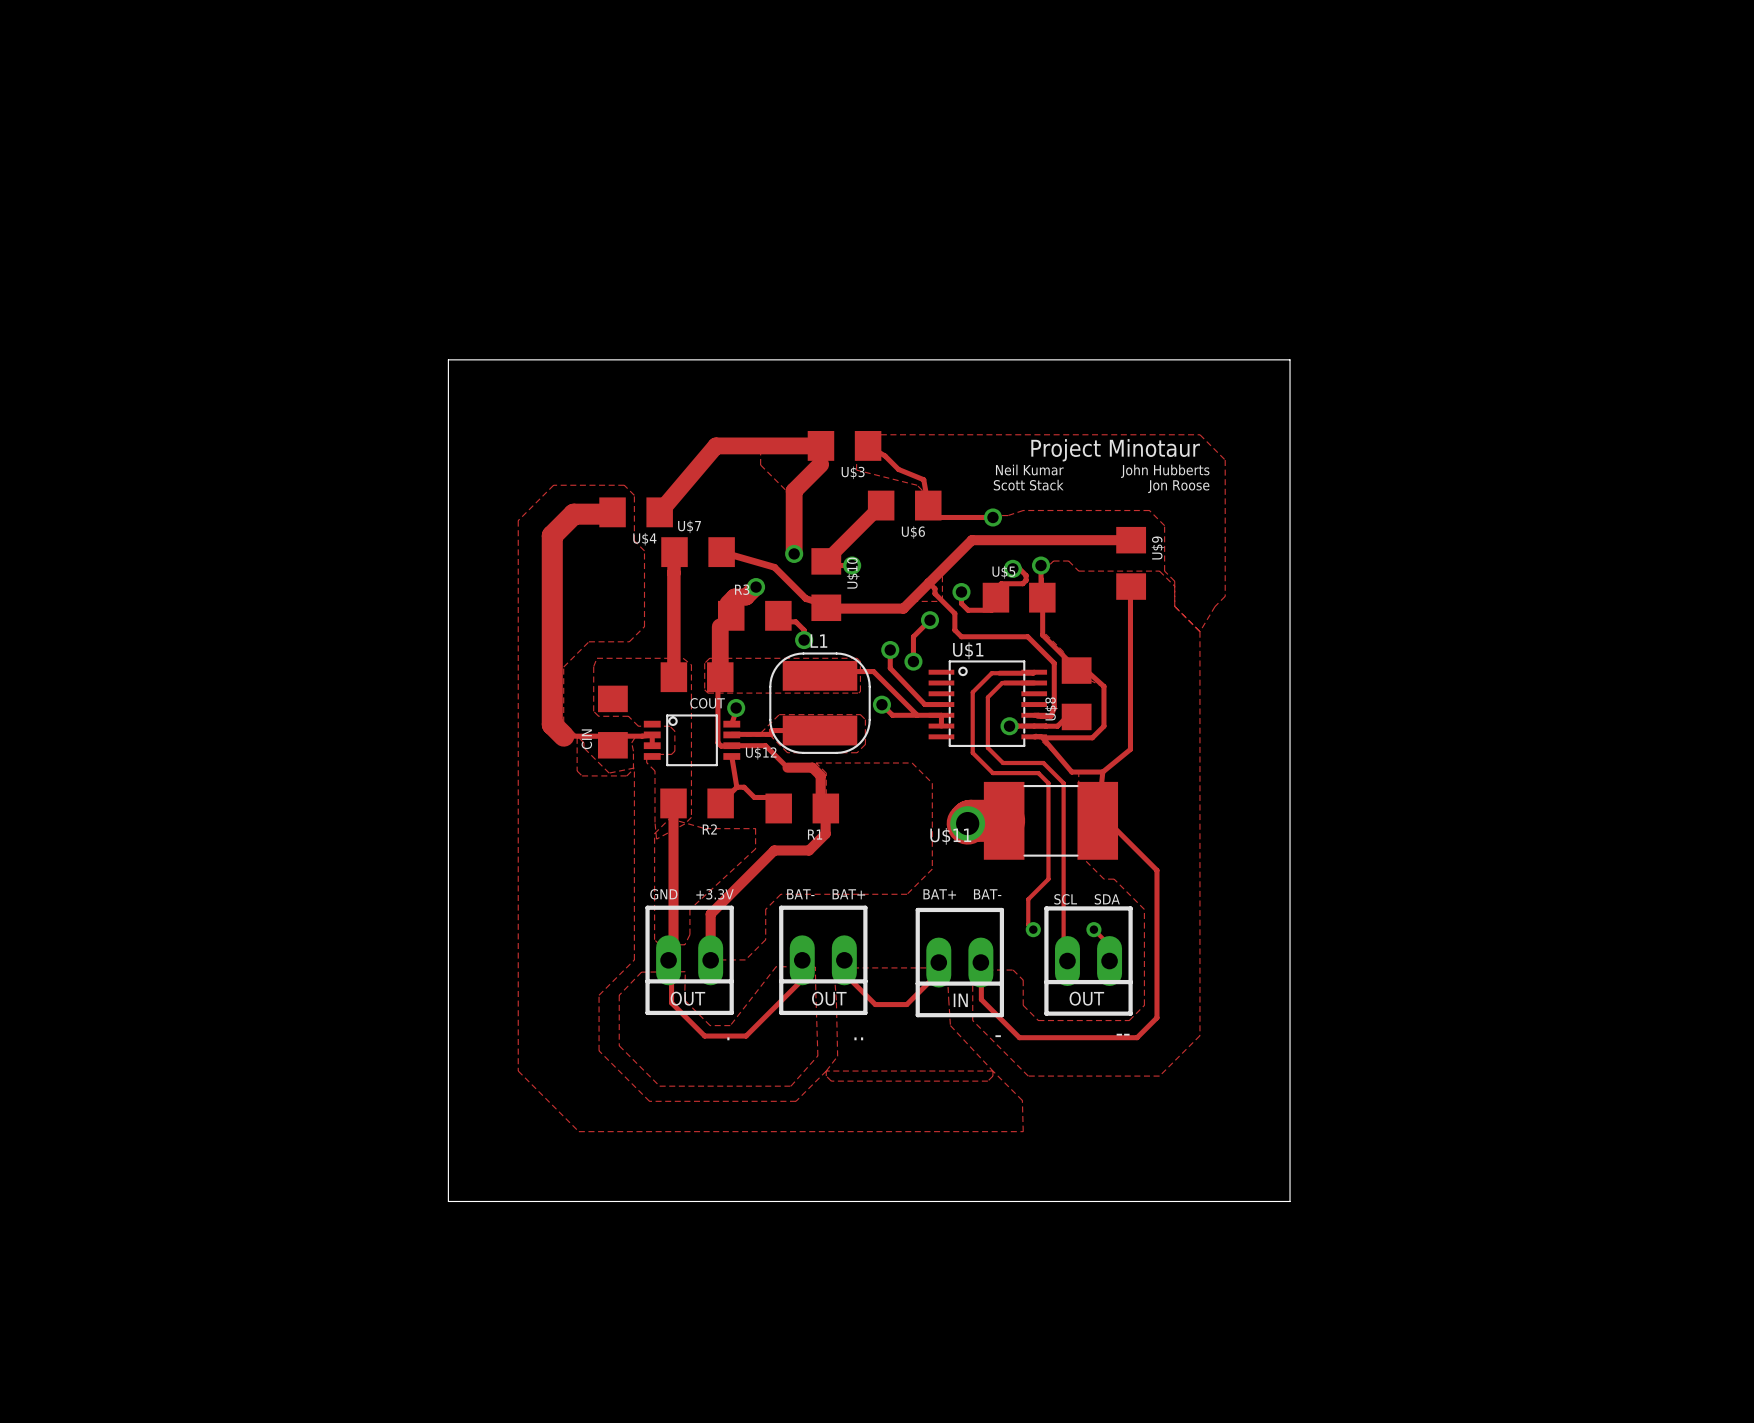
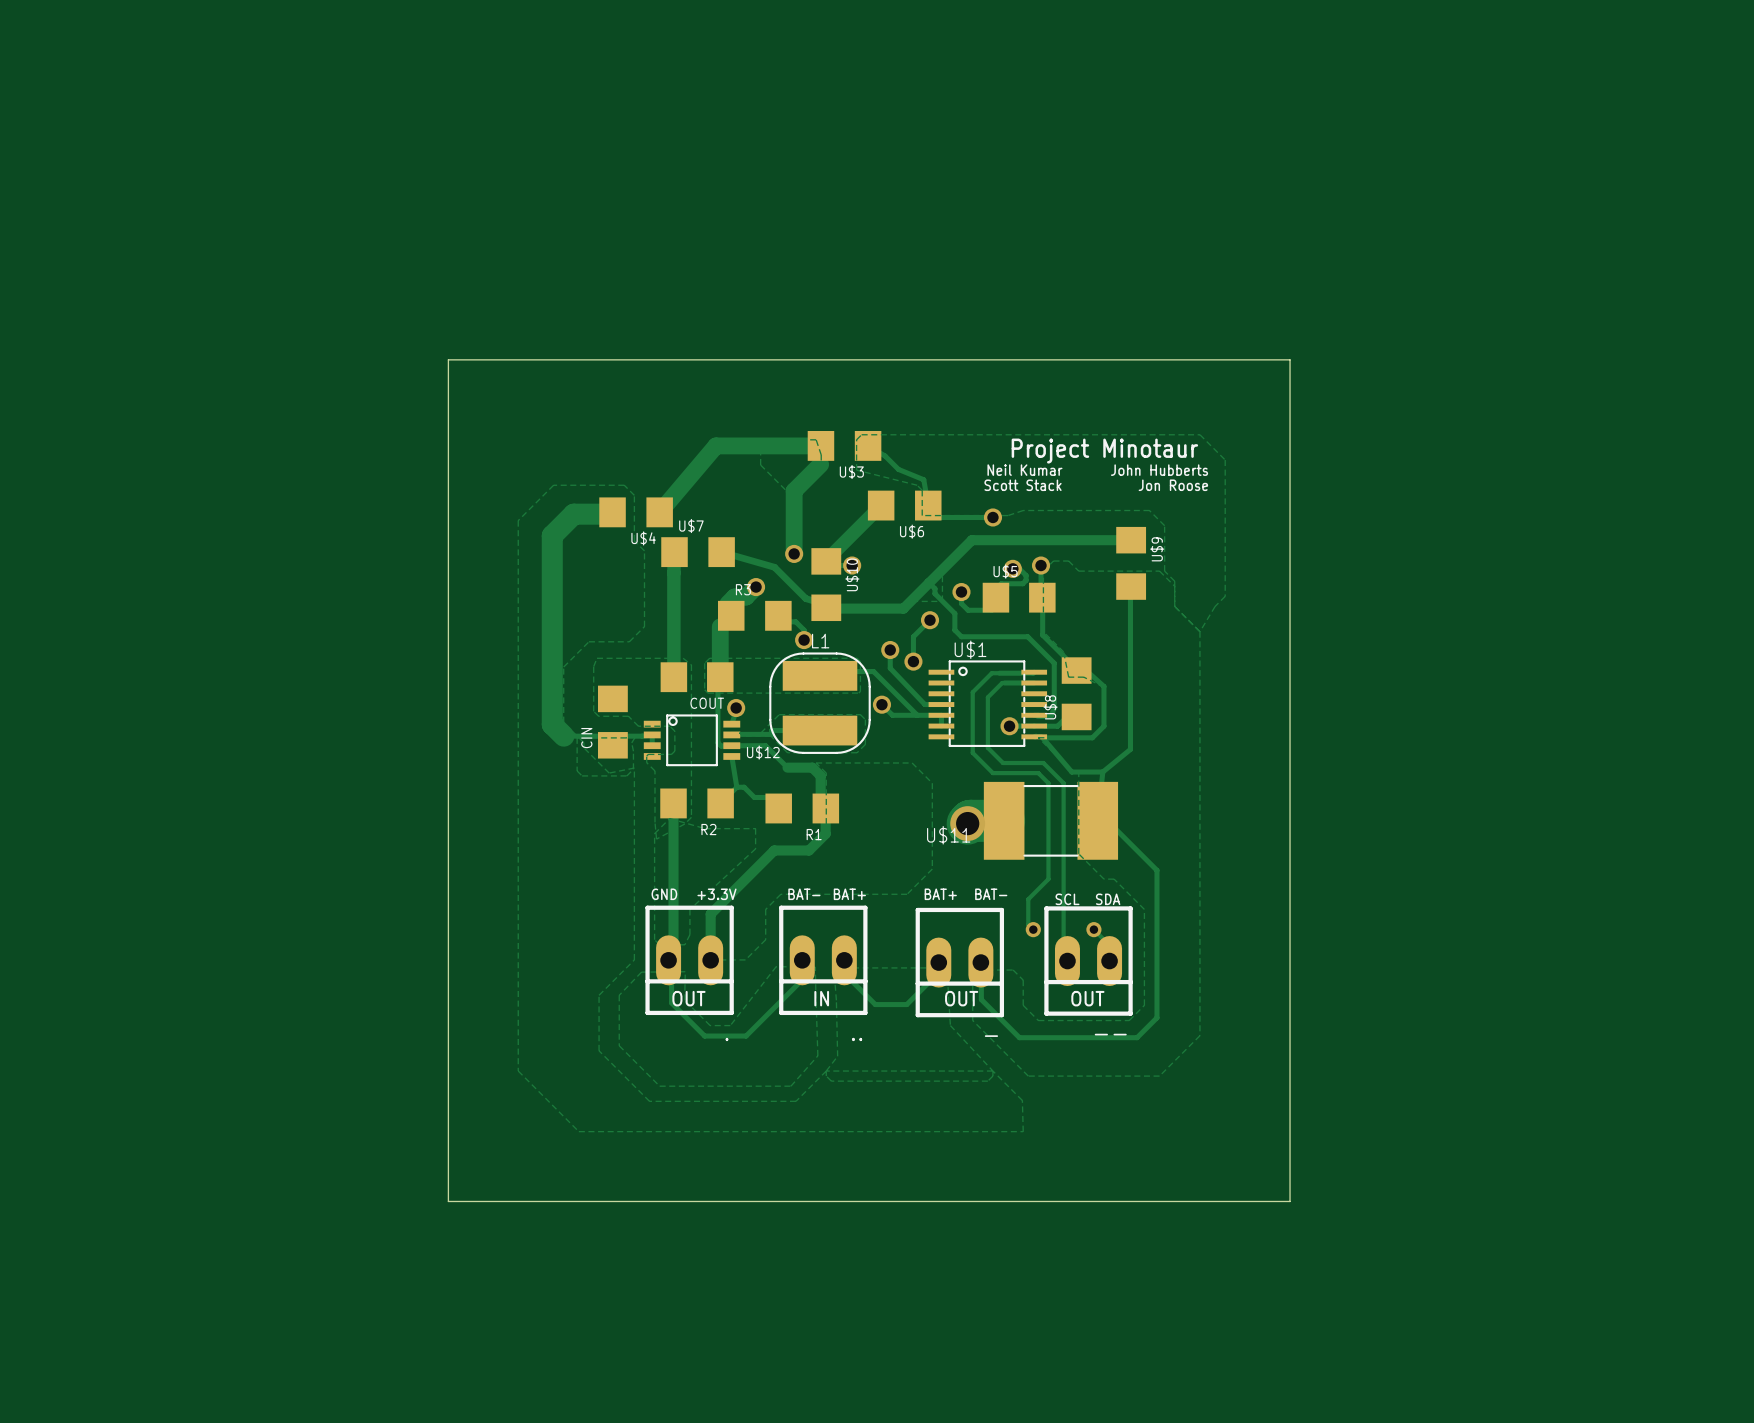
text: OUT (829, 998) -> IN (821, 998)
text: IN (960, 1000) -> OUT (961, 998)

